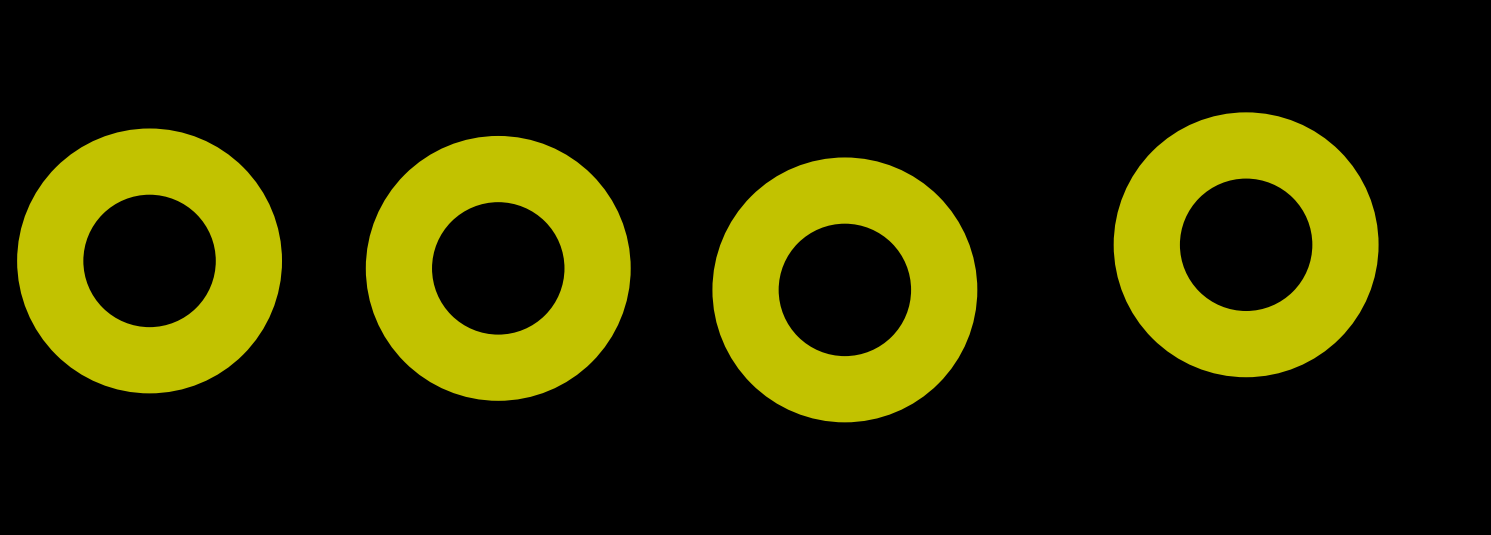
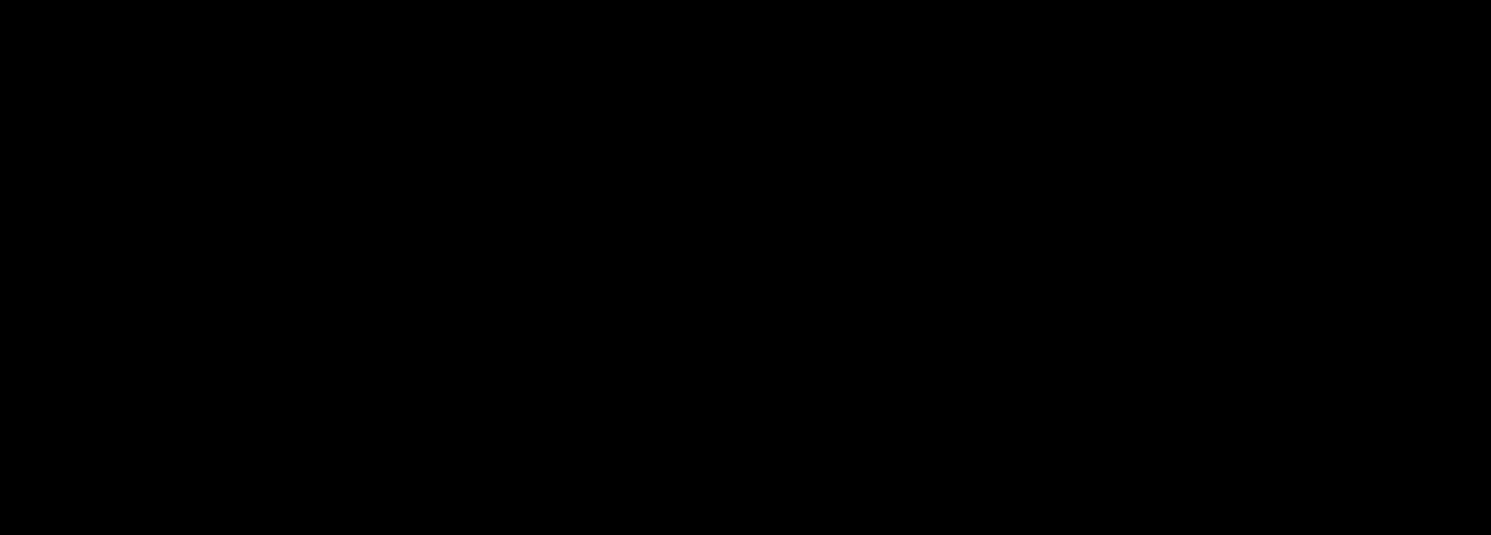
part: (1246, 244) -> none
part: (149, 260) -> none
part: (498, 268) -> none
part: (844, 289) -> none

